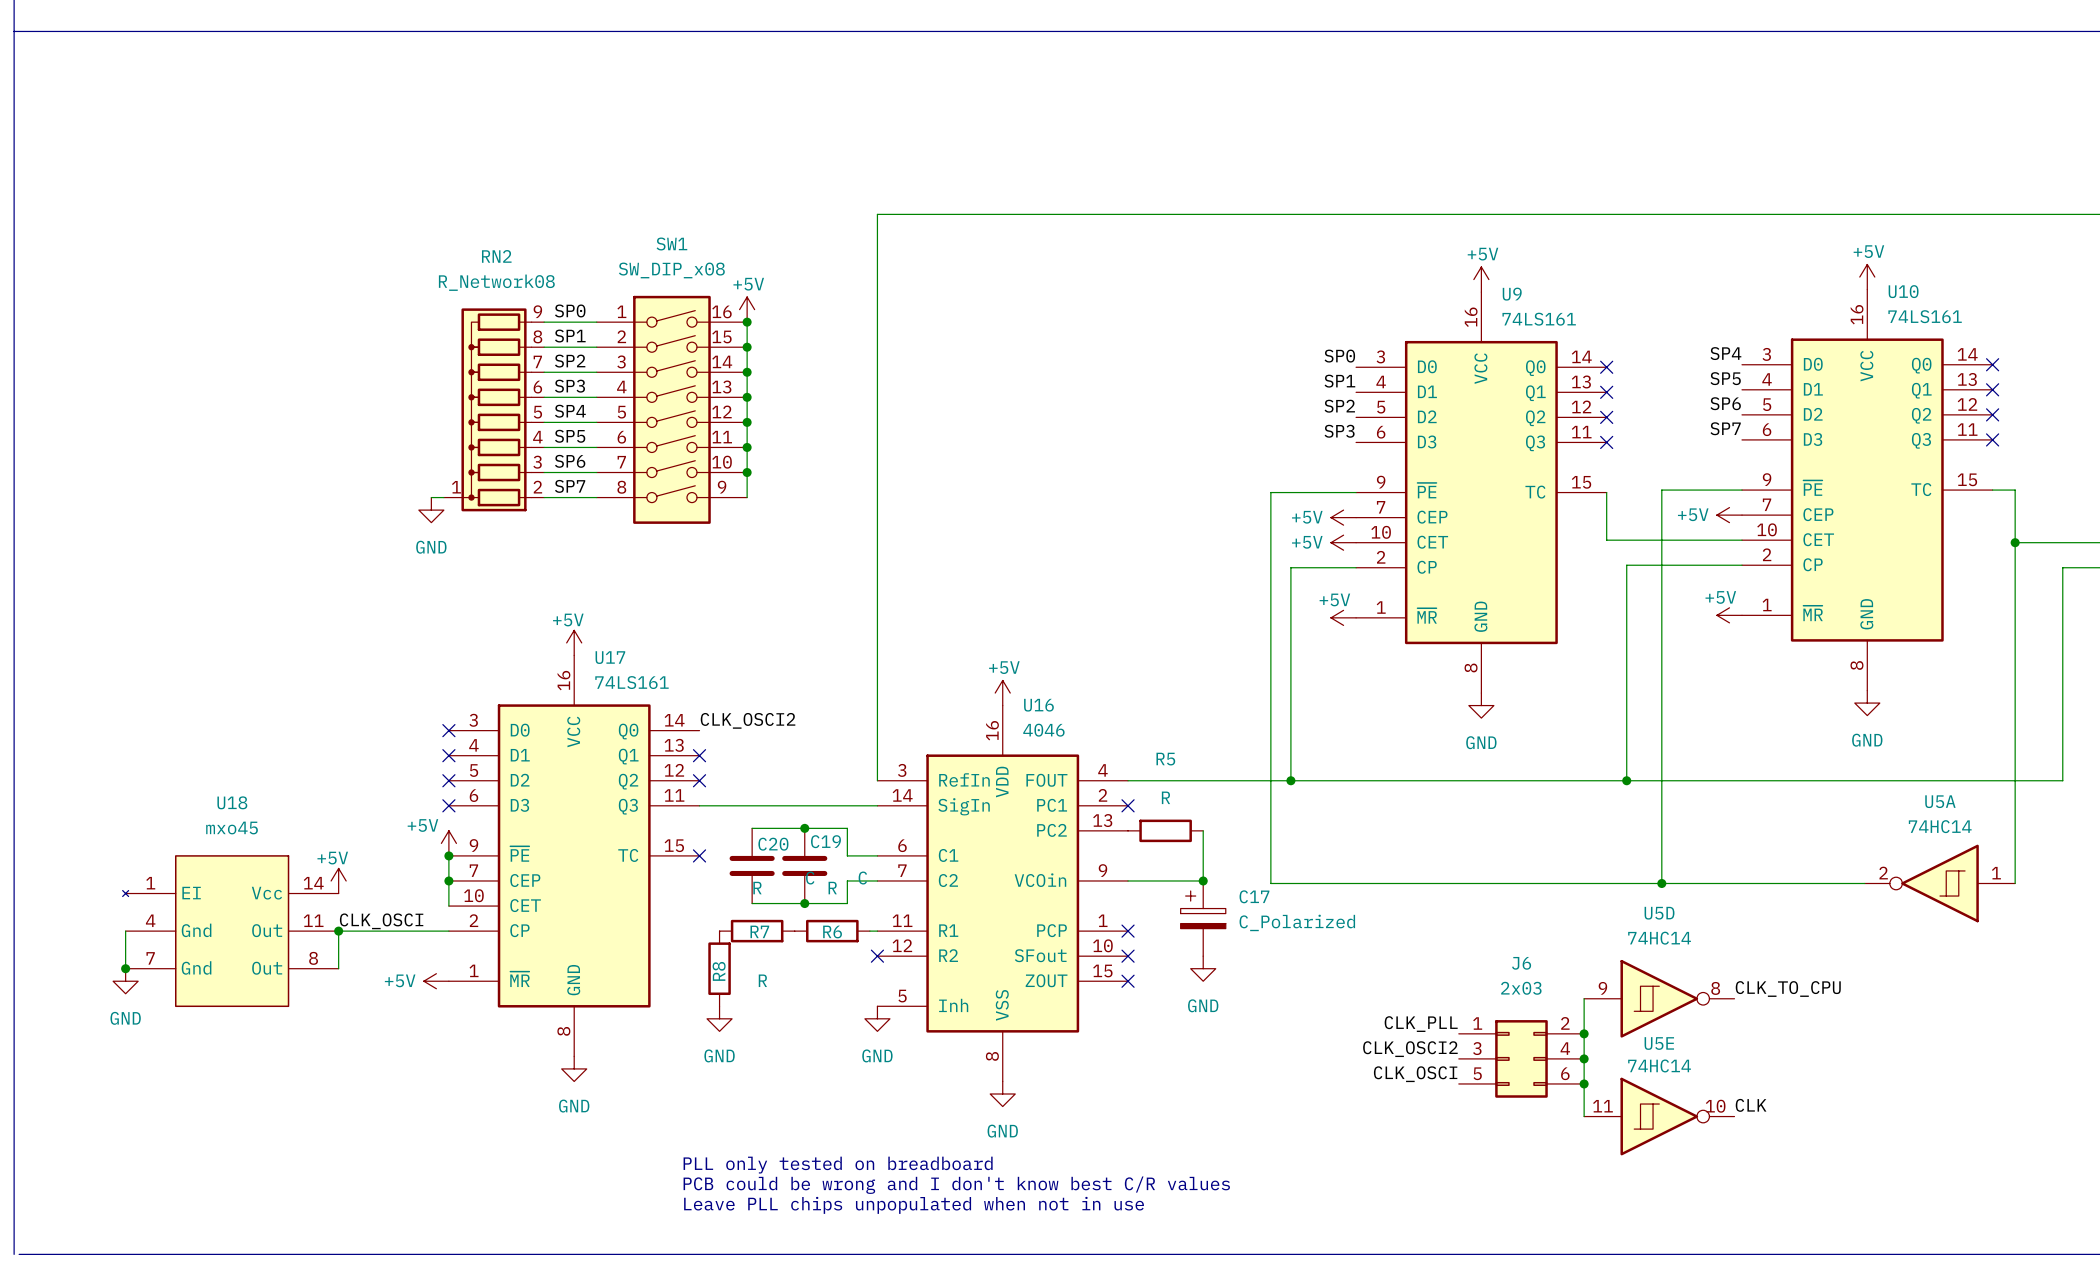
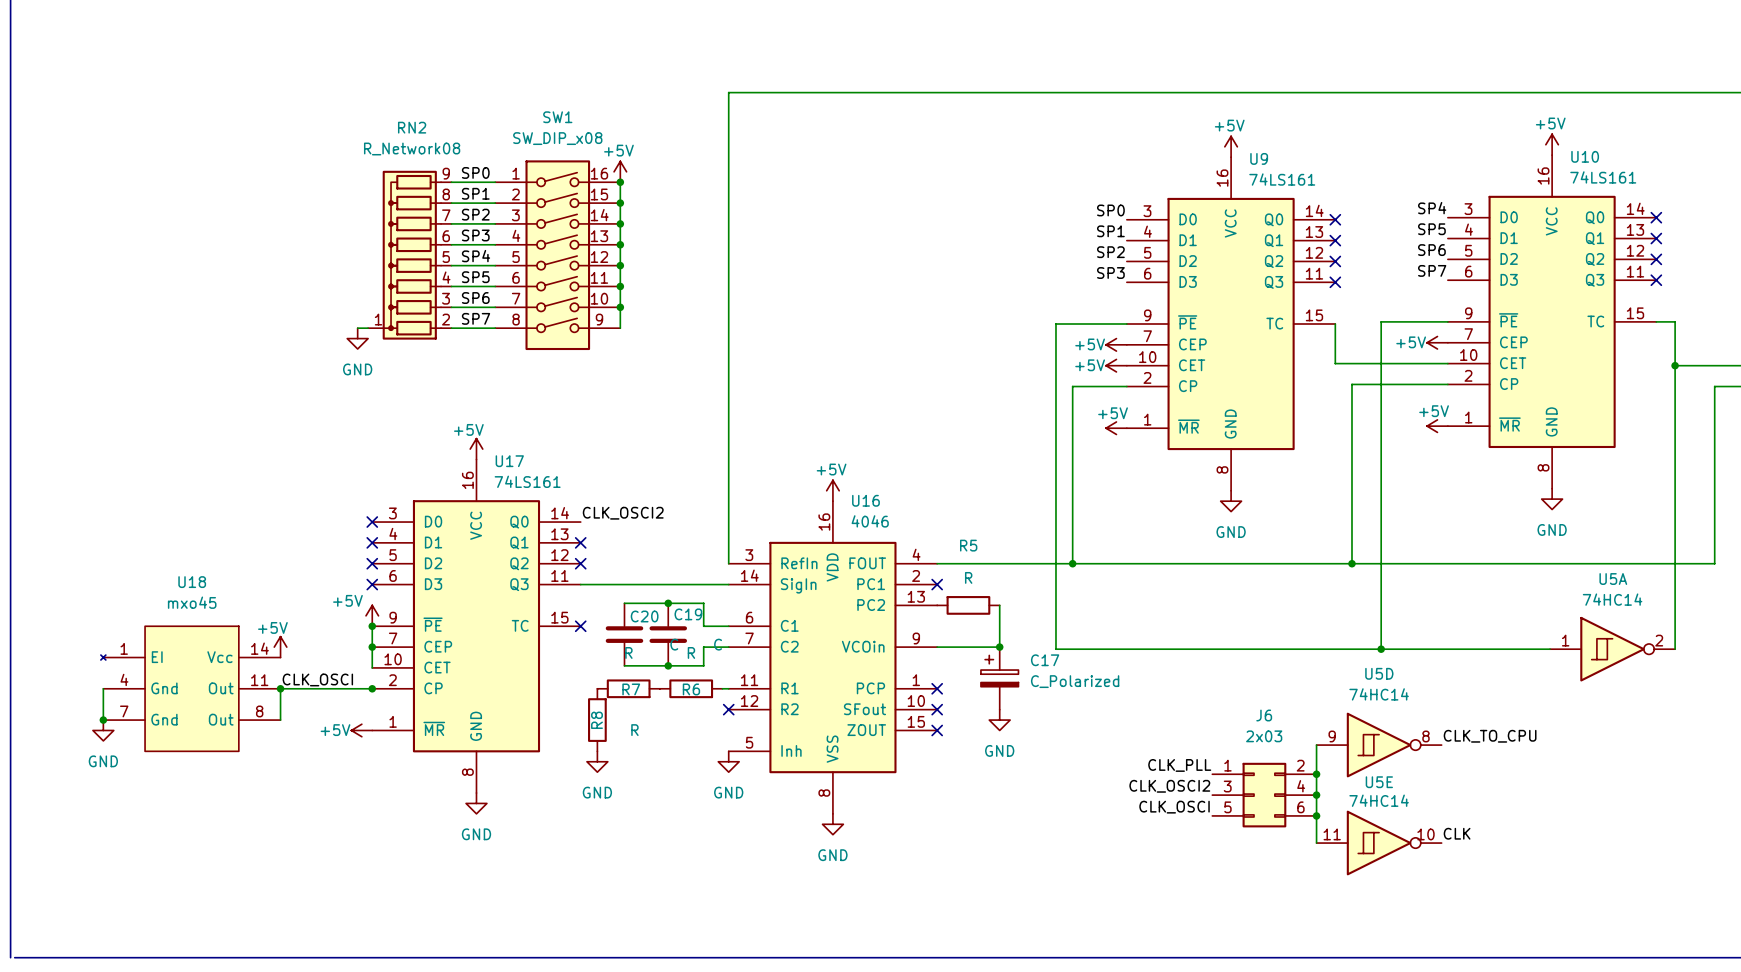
U5A rotation: 0° (1939, 883) -> 180° (1612, 649)
junction: none -> (372, 688)
text: PLL only tested on breadboard (838, 1165) -> none
text: PCB could be wrong and I don't know best C/R values (956, 1185) -> none
text: Leave PLL chips unpopulated when not in use (914, 1205) -> none

